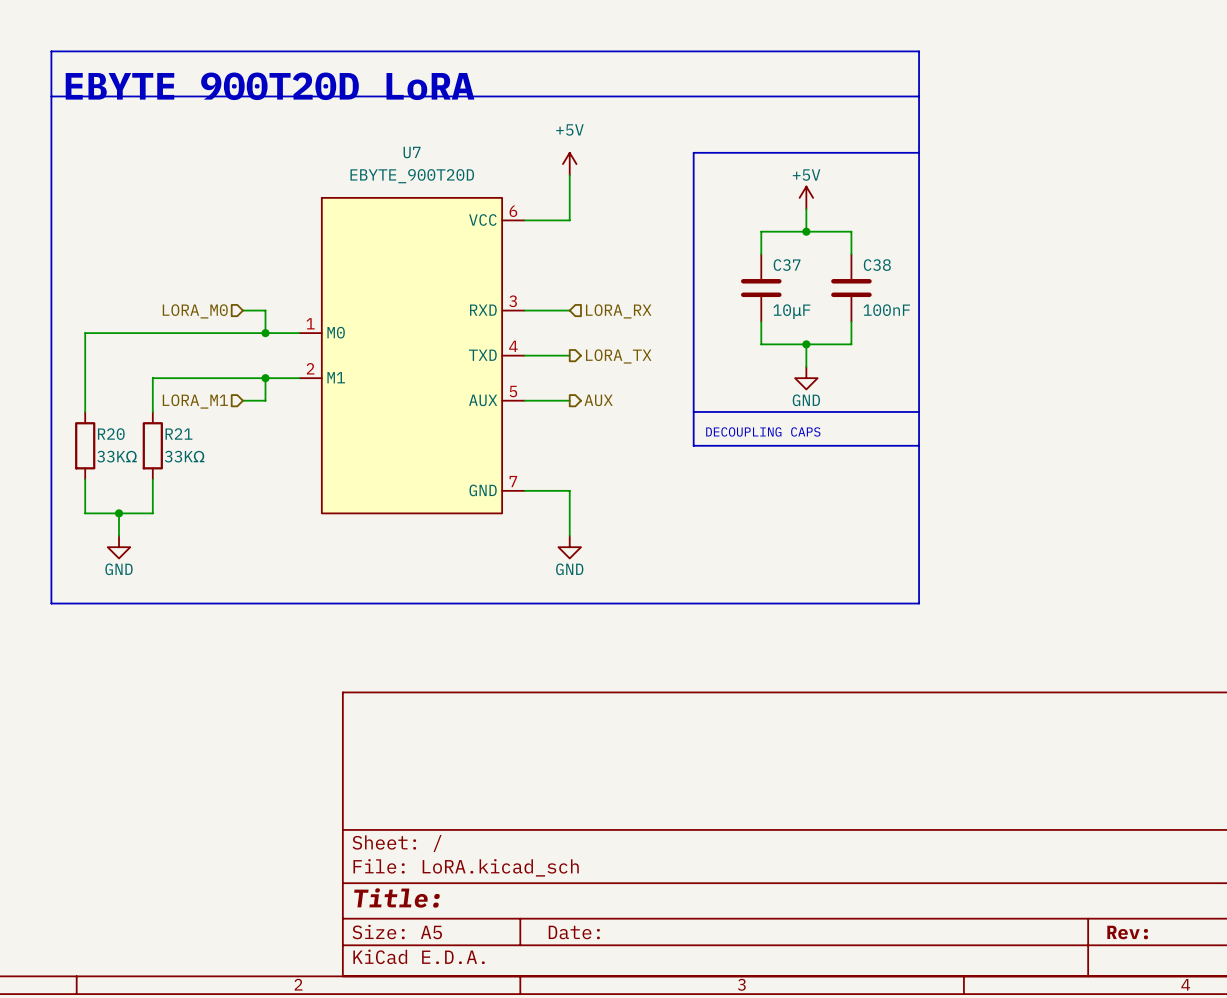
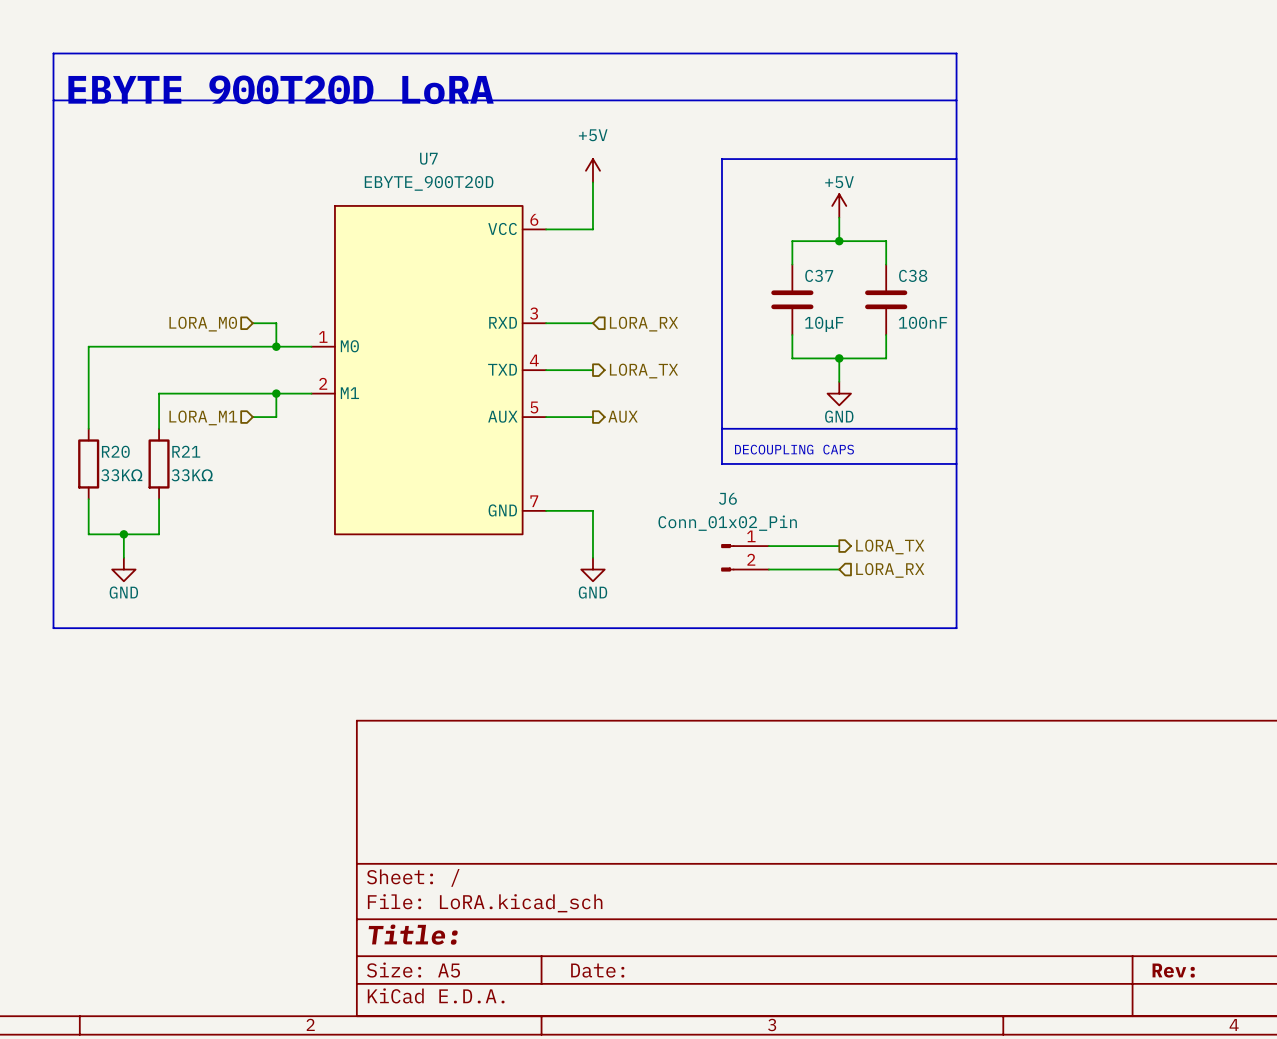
wire: none -> (768, 546) (839, 546)
hierarchical label: none -> LORA_TX (890, 546)
J6: none -> Conn_01x02_Pin (745, 557)
wire: none -> (768, 569) (839, 569)
hierarchical label: none -> LORA_RX (890, 570)

